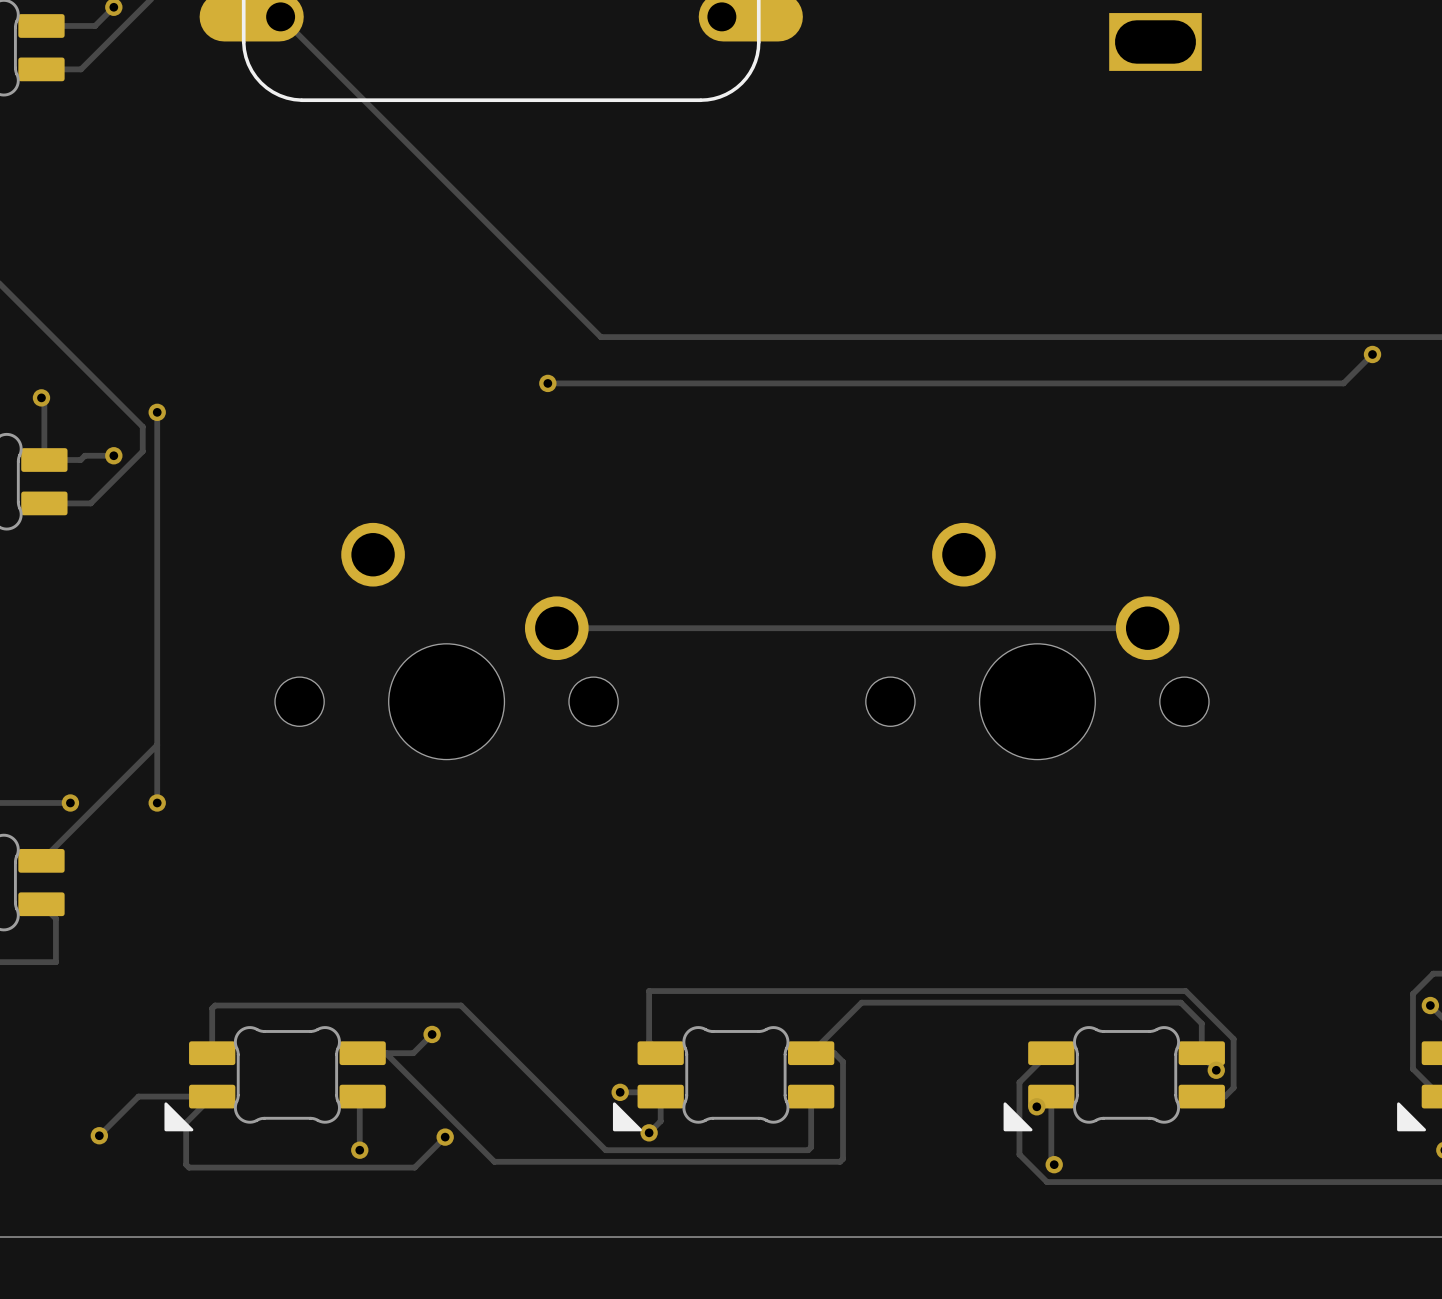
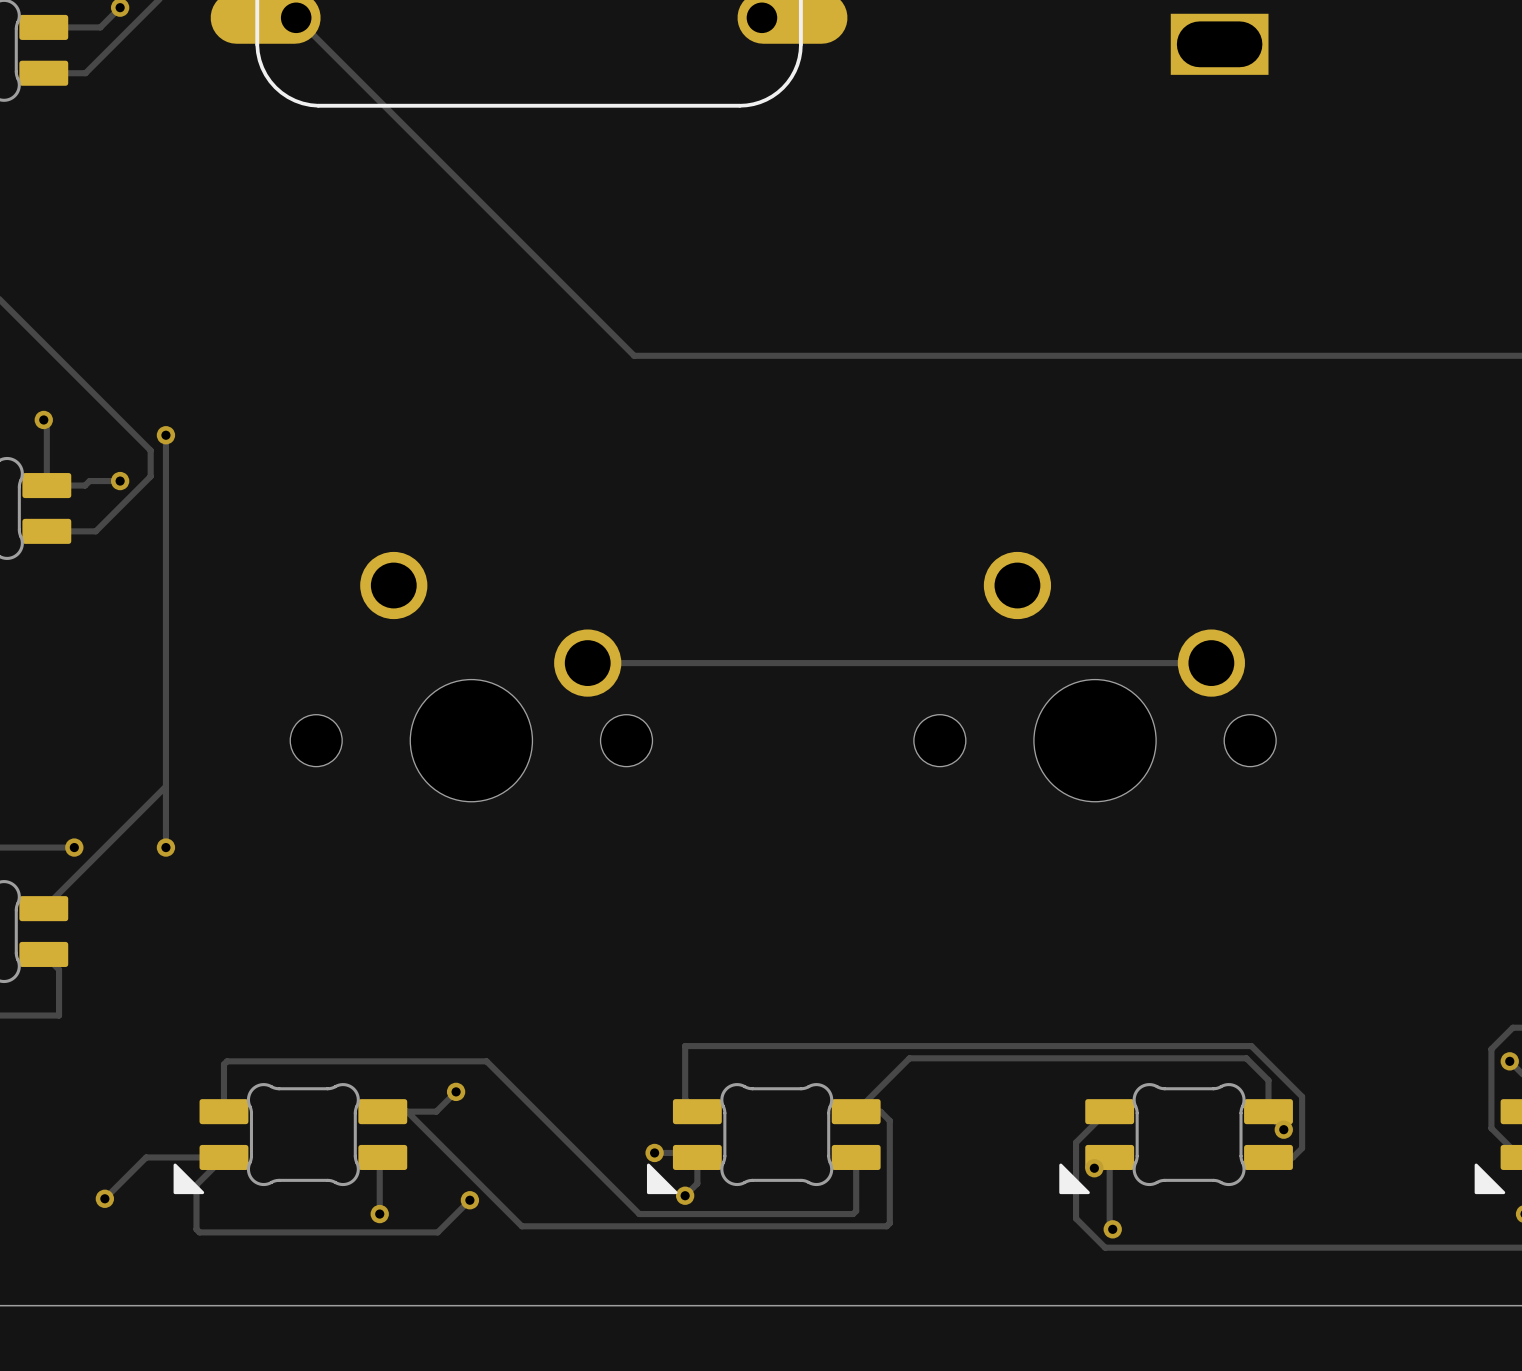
track: (1372, 354) (1343, 383) (547, 383) -> none
via: (1372, 354) -> none
via: (547, 383) -> none

